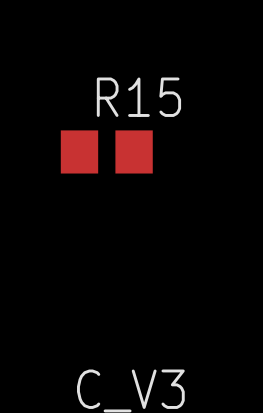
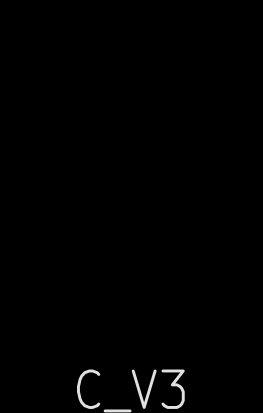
R15: (106, 151) -> none

